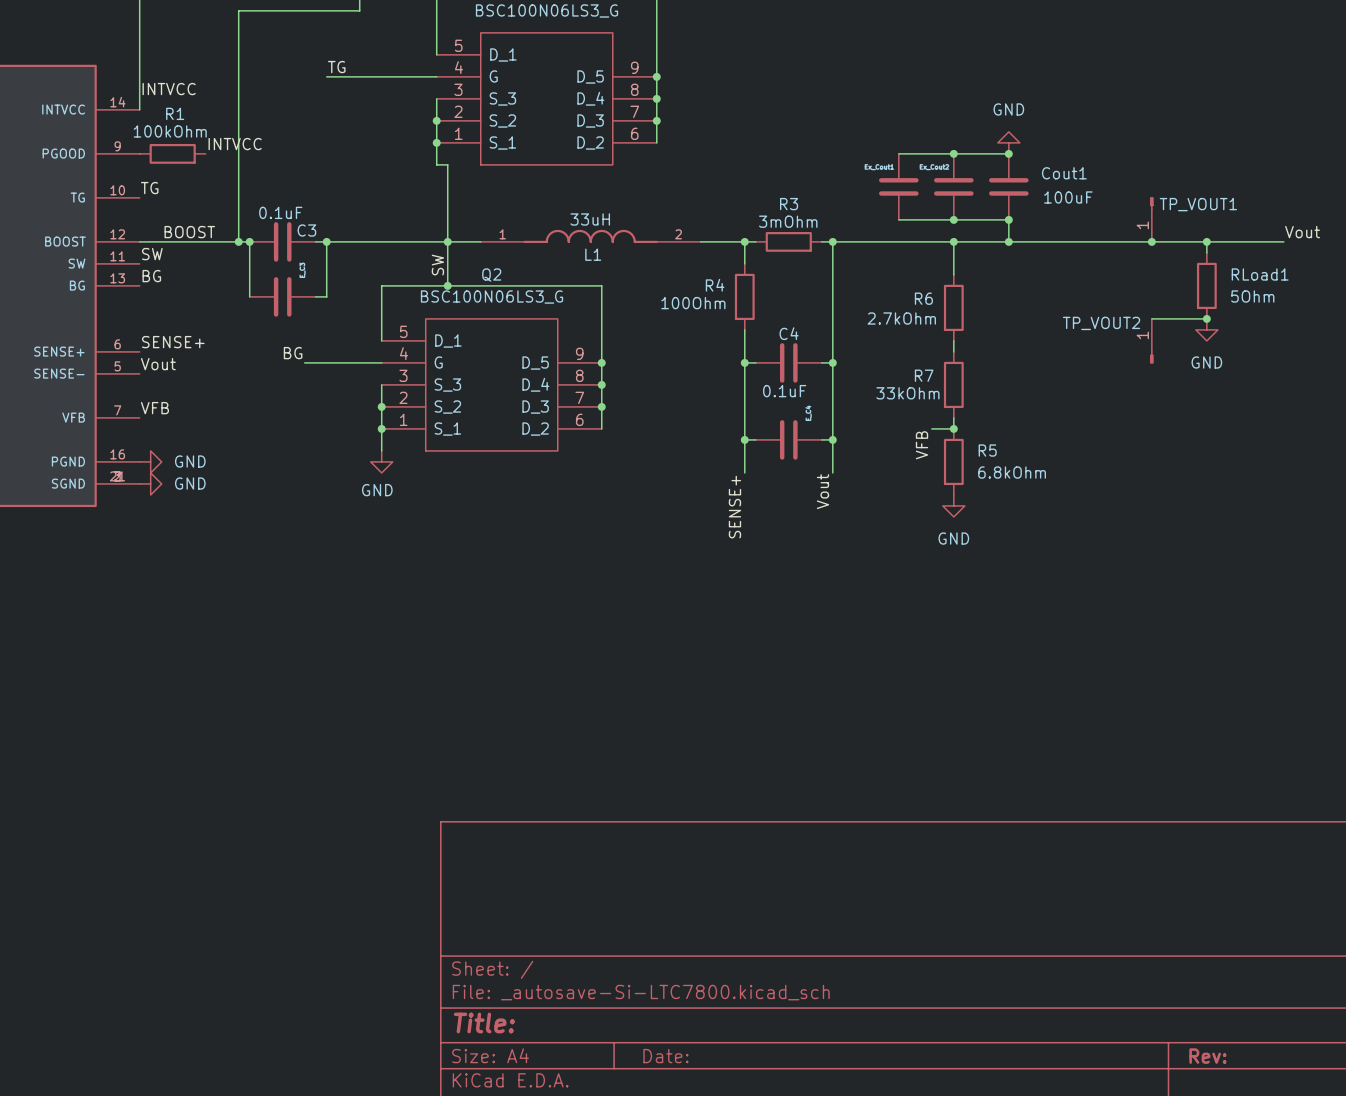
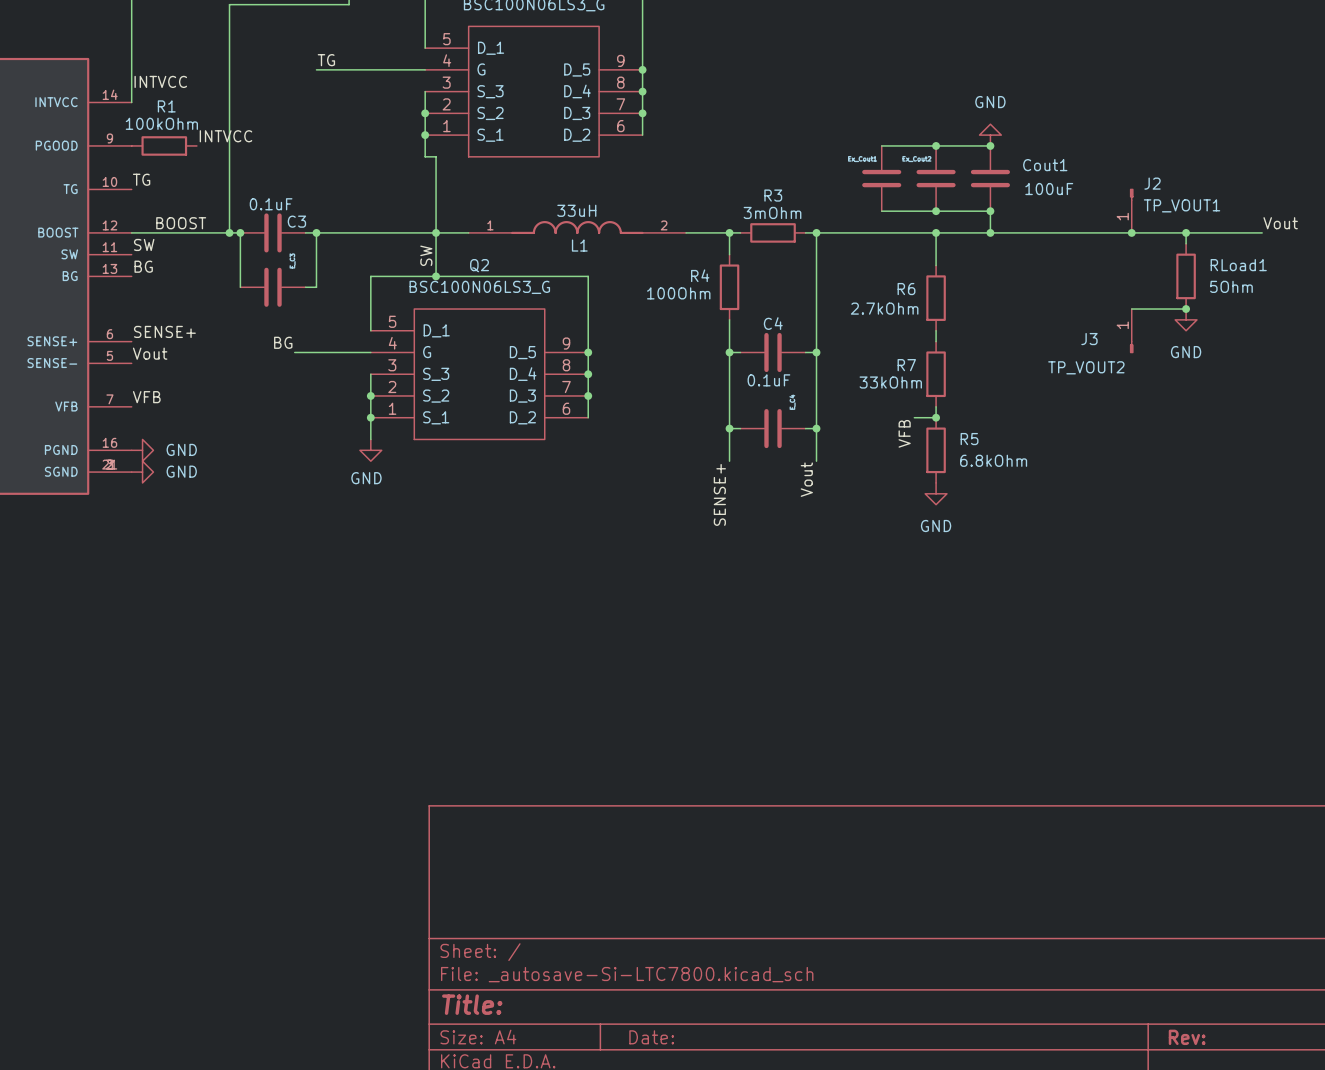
TP_VOUT1 name: TP_VOUT1 (1198, 204) -> J2 (1152, 183)
TP_VOUT1 value: none -> TP_VOUT1 (1182, 205)
TP_VOUT2 name: TP_VOUT2 (1101, 323) -> J3 (1089, 339)
TP_VOUT2 value: none -> TP_VOUT2 (1086, 367)

